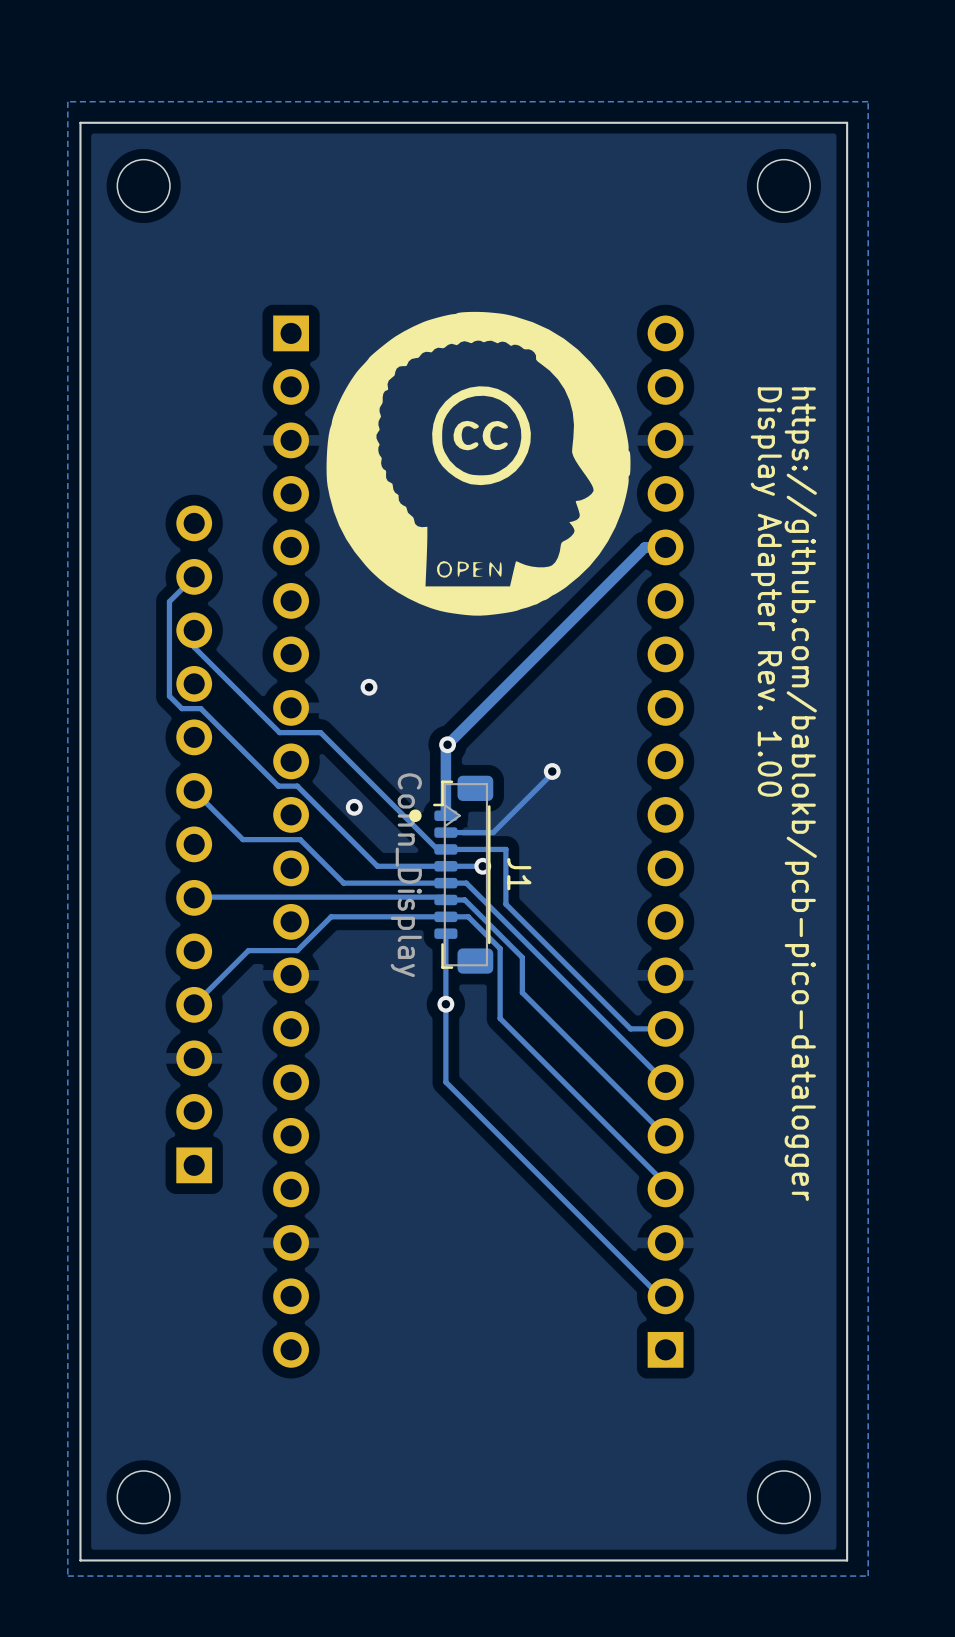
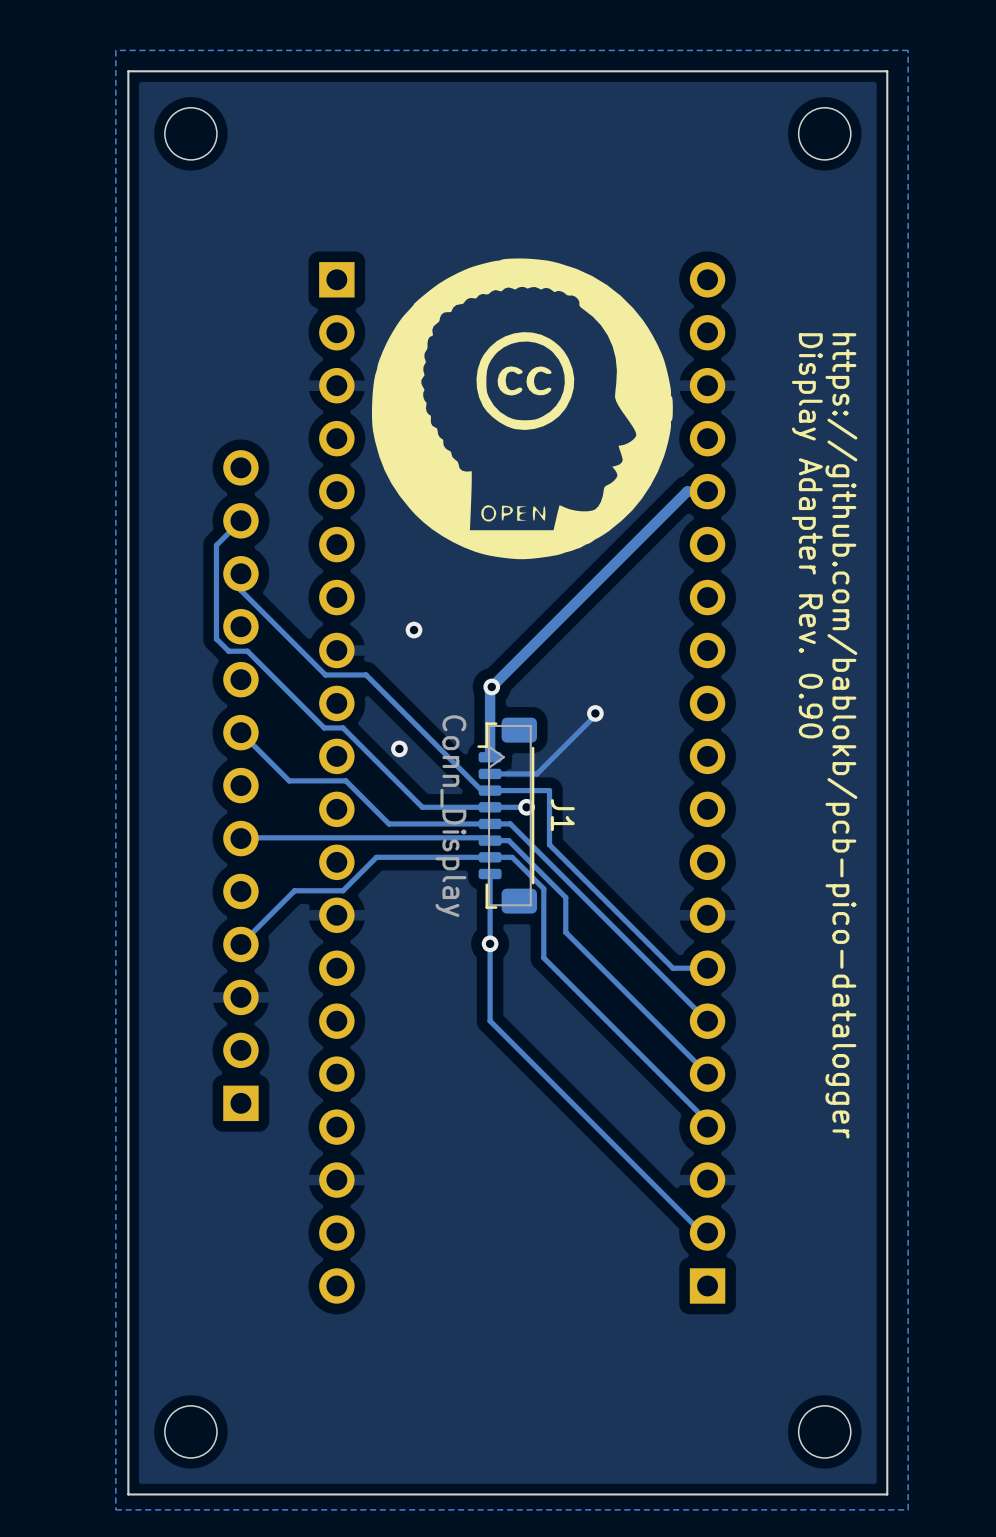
text: Display Adapter Rev. 1.00 (766, 592) -> Display Adapter Rev. 0.90 (807, 535)
drawing: [409, 809, 422, 823] -> none

